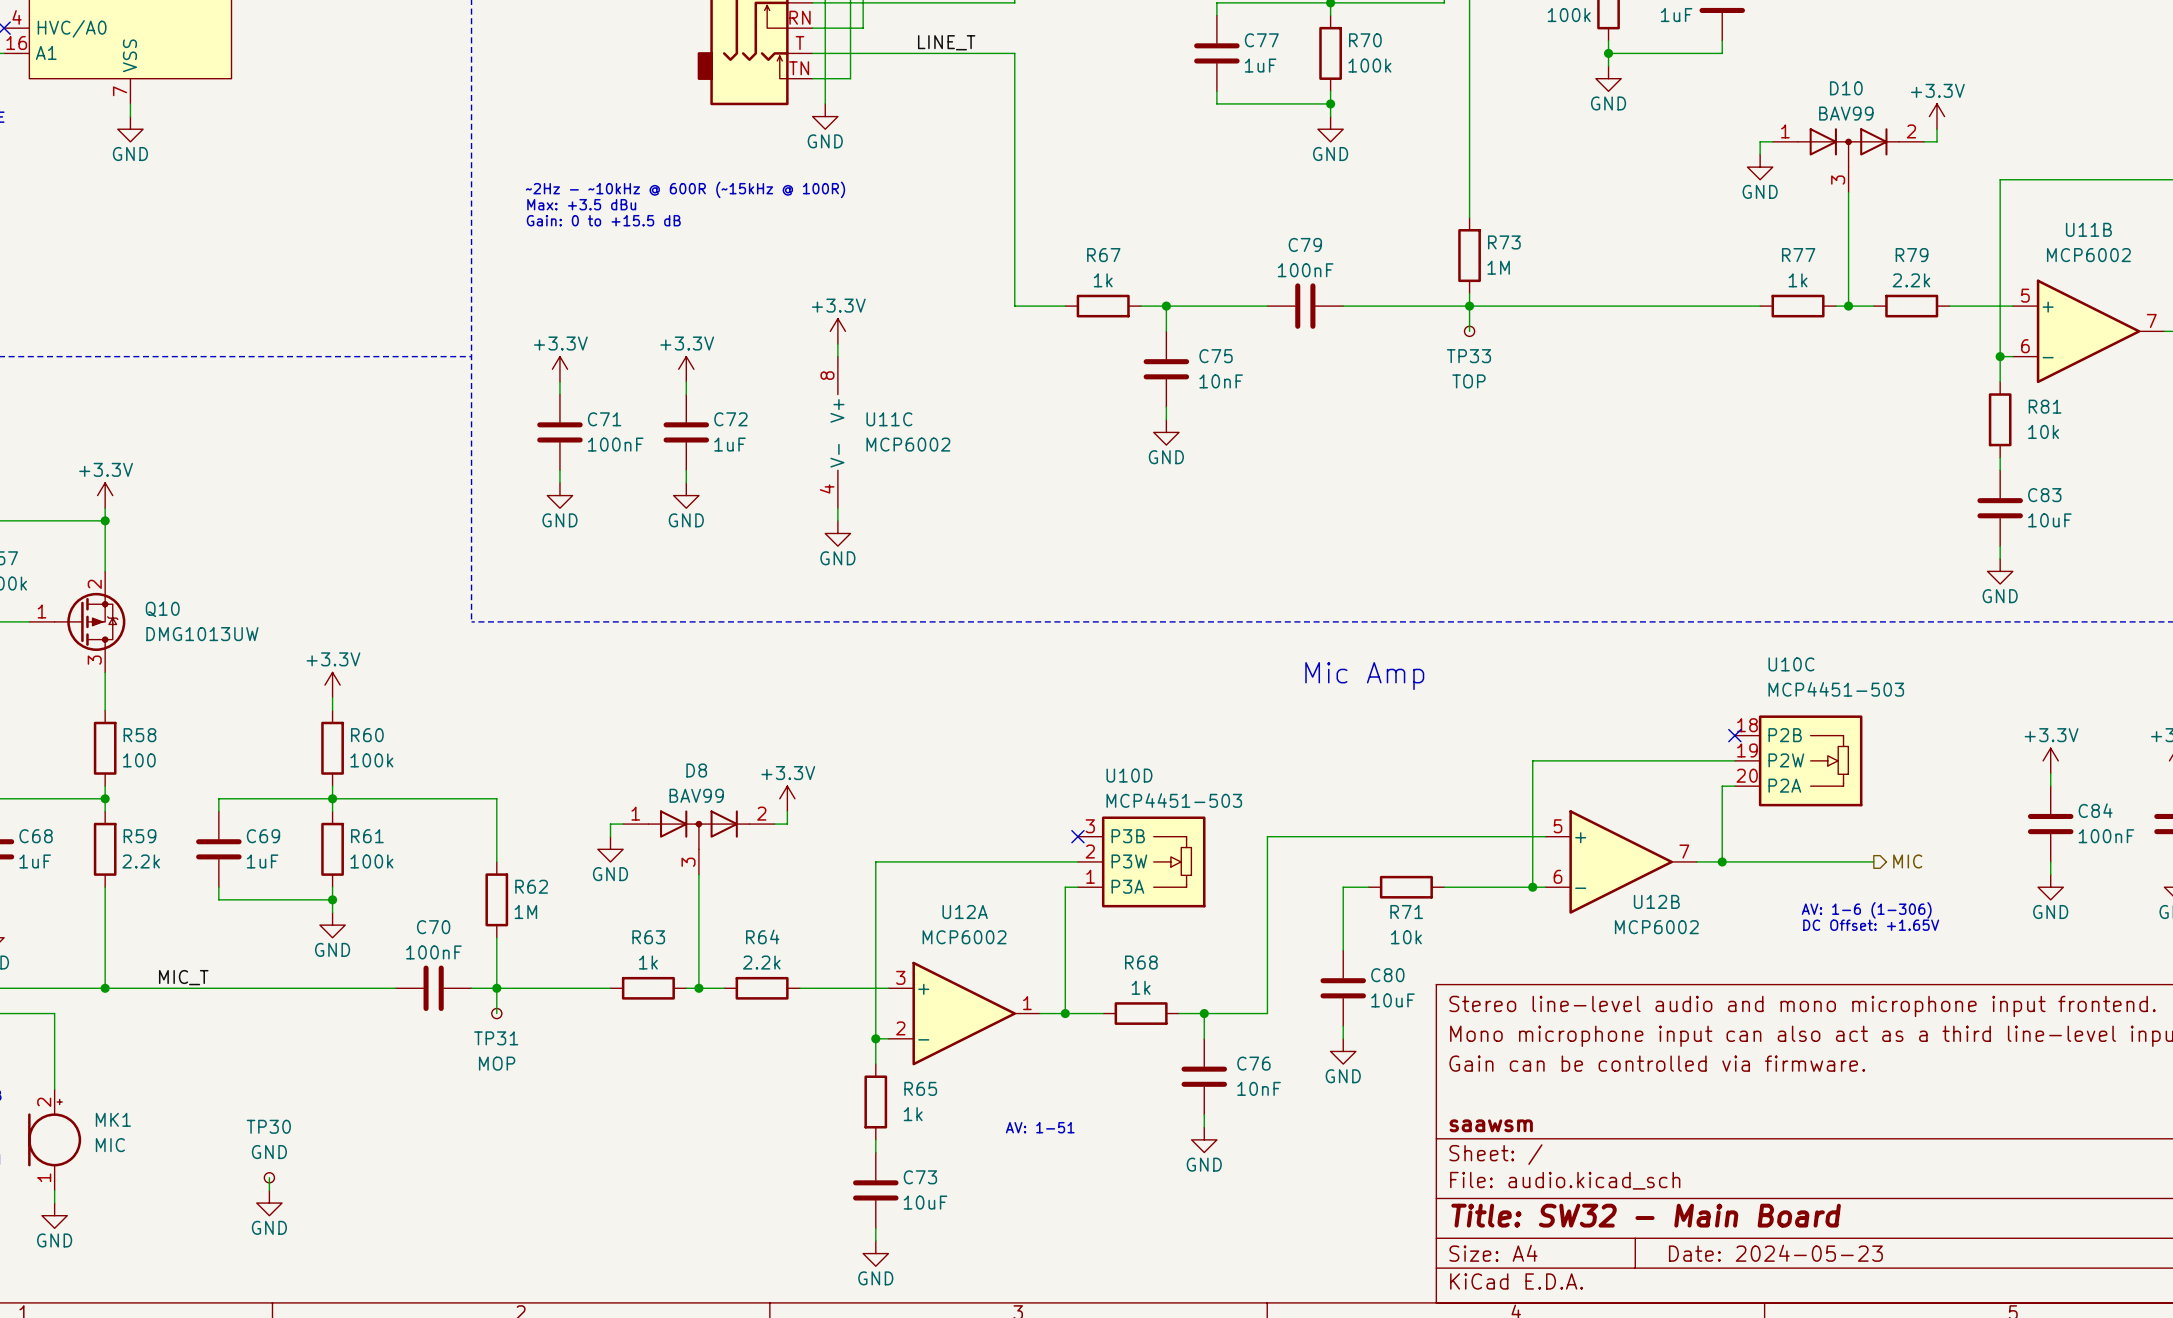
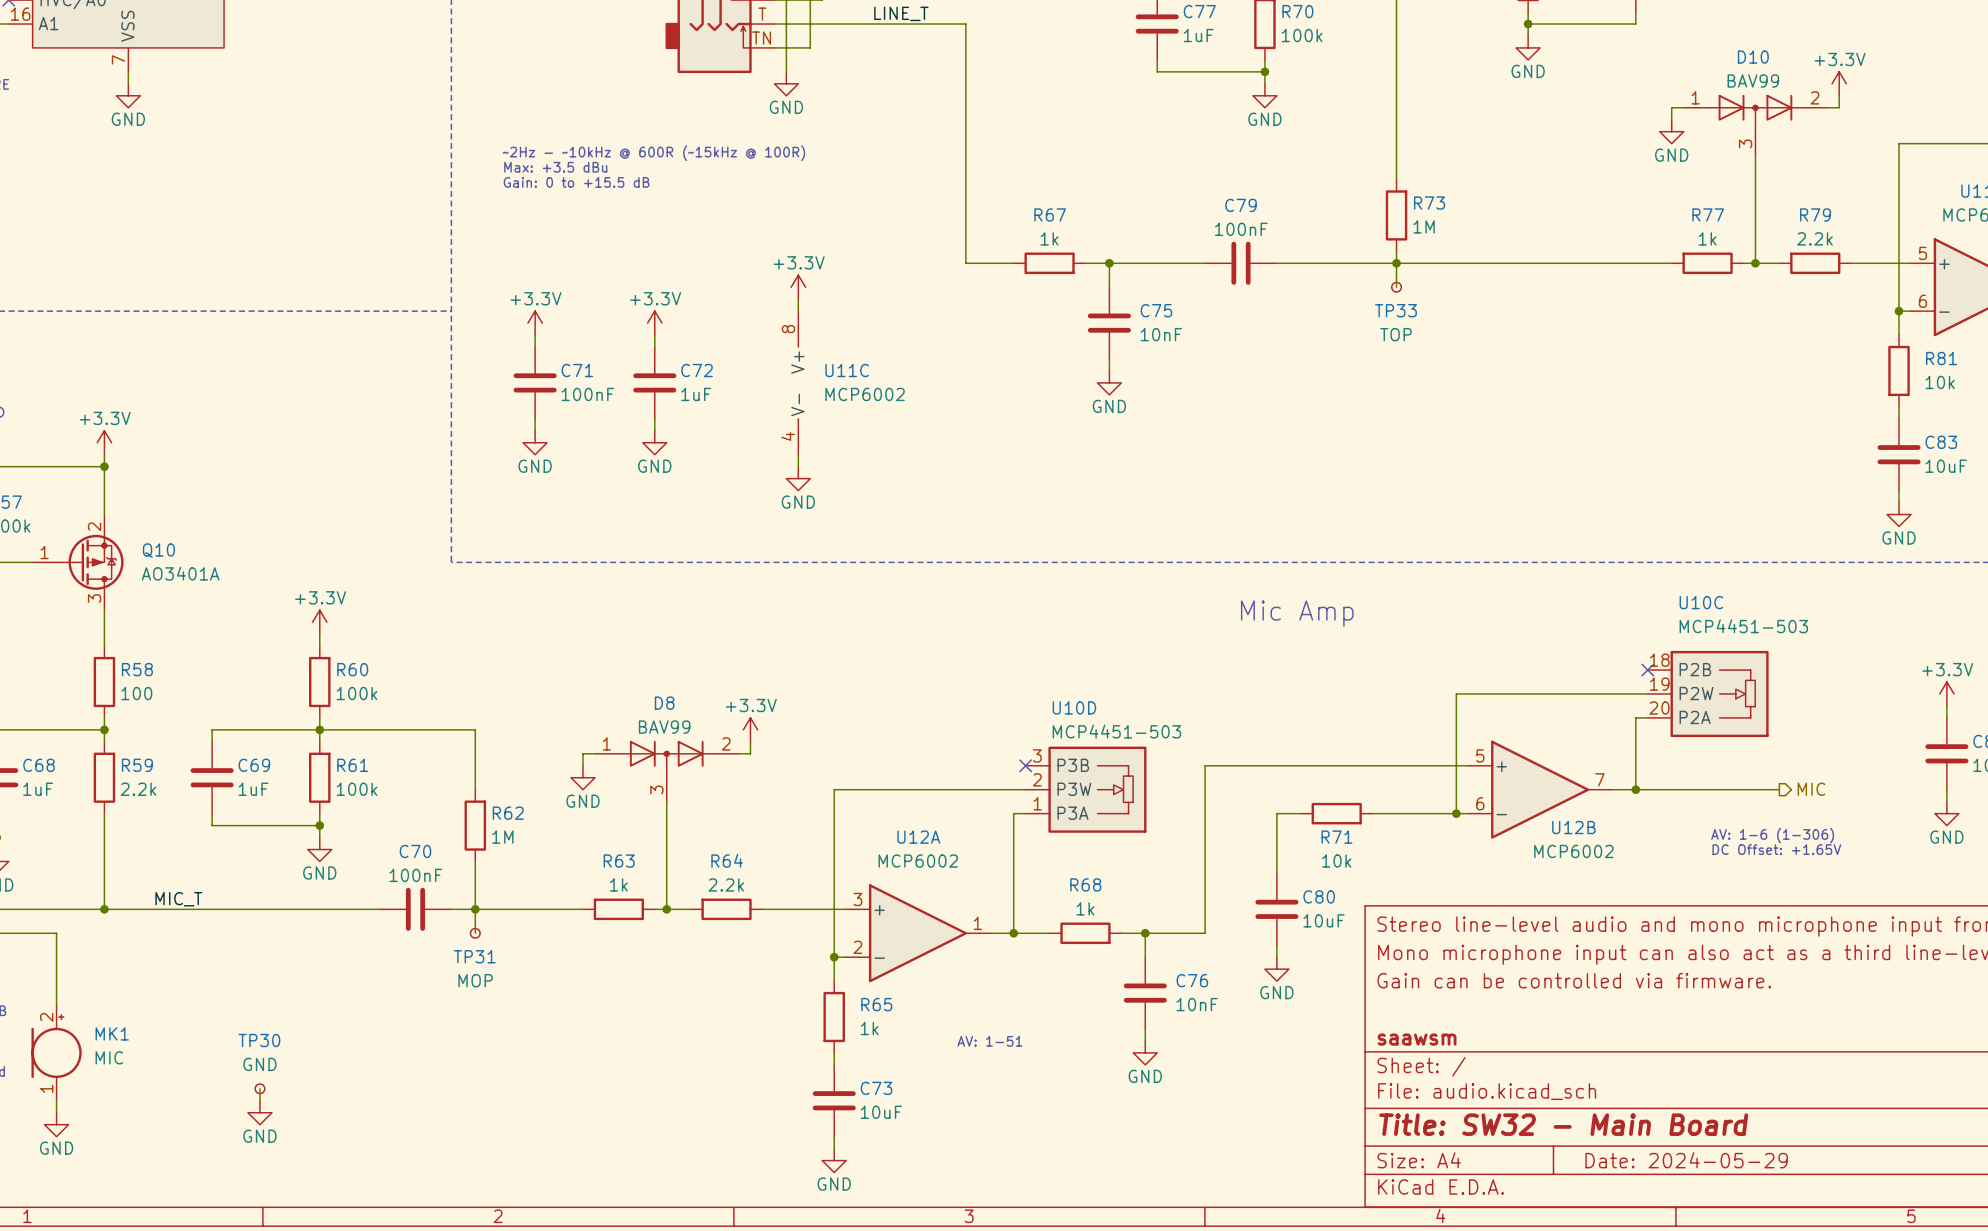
Q10 value: DMG1013UW (202, 634) -> AO3401A (180, 573)
title block: Date: 2024-05-23 (1775, 1253) -> Date: 2024-05-29 (1686, 1160)

